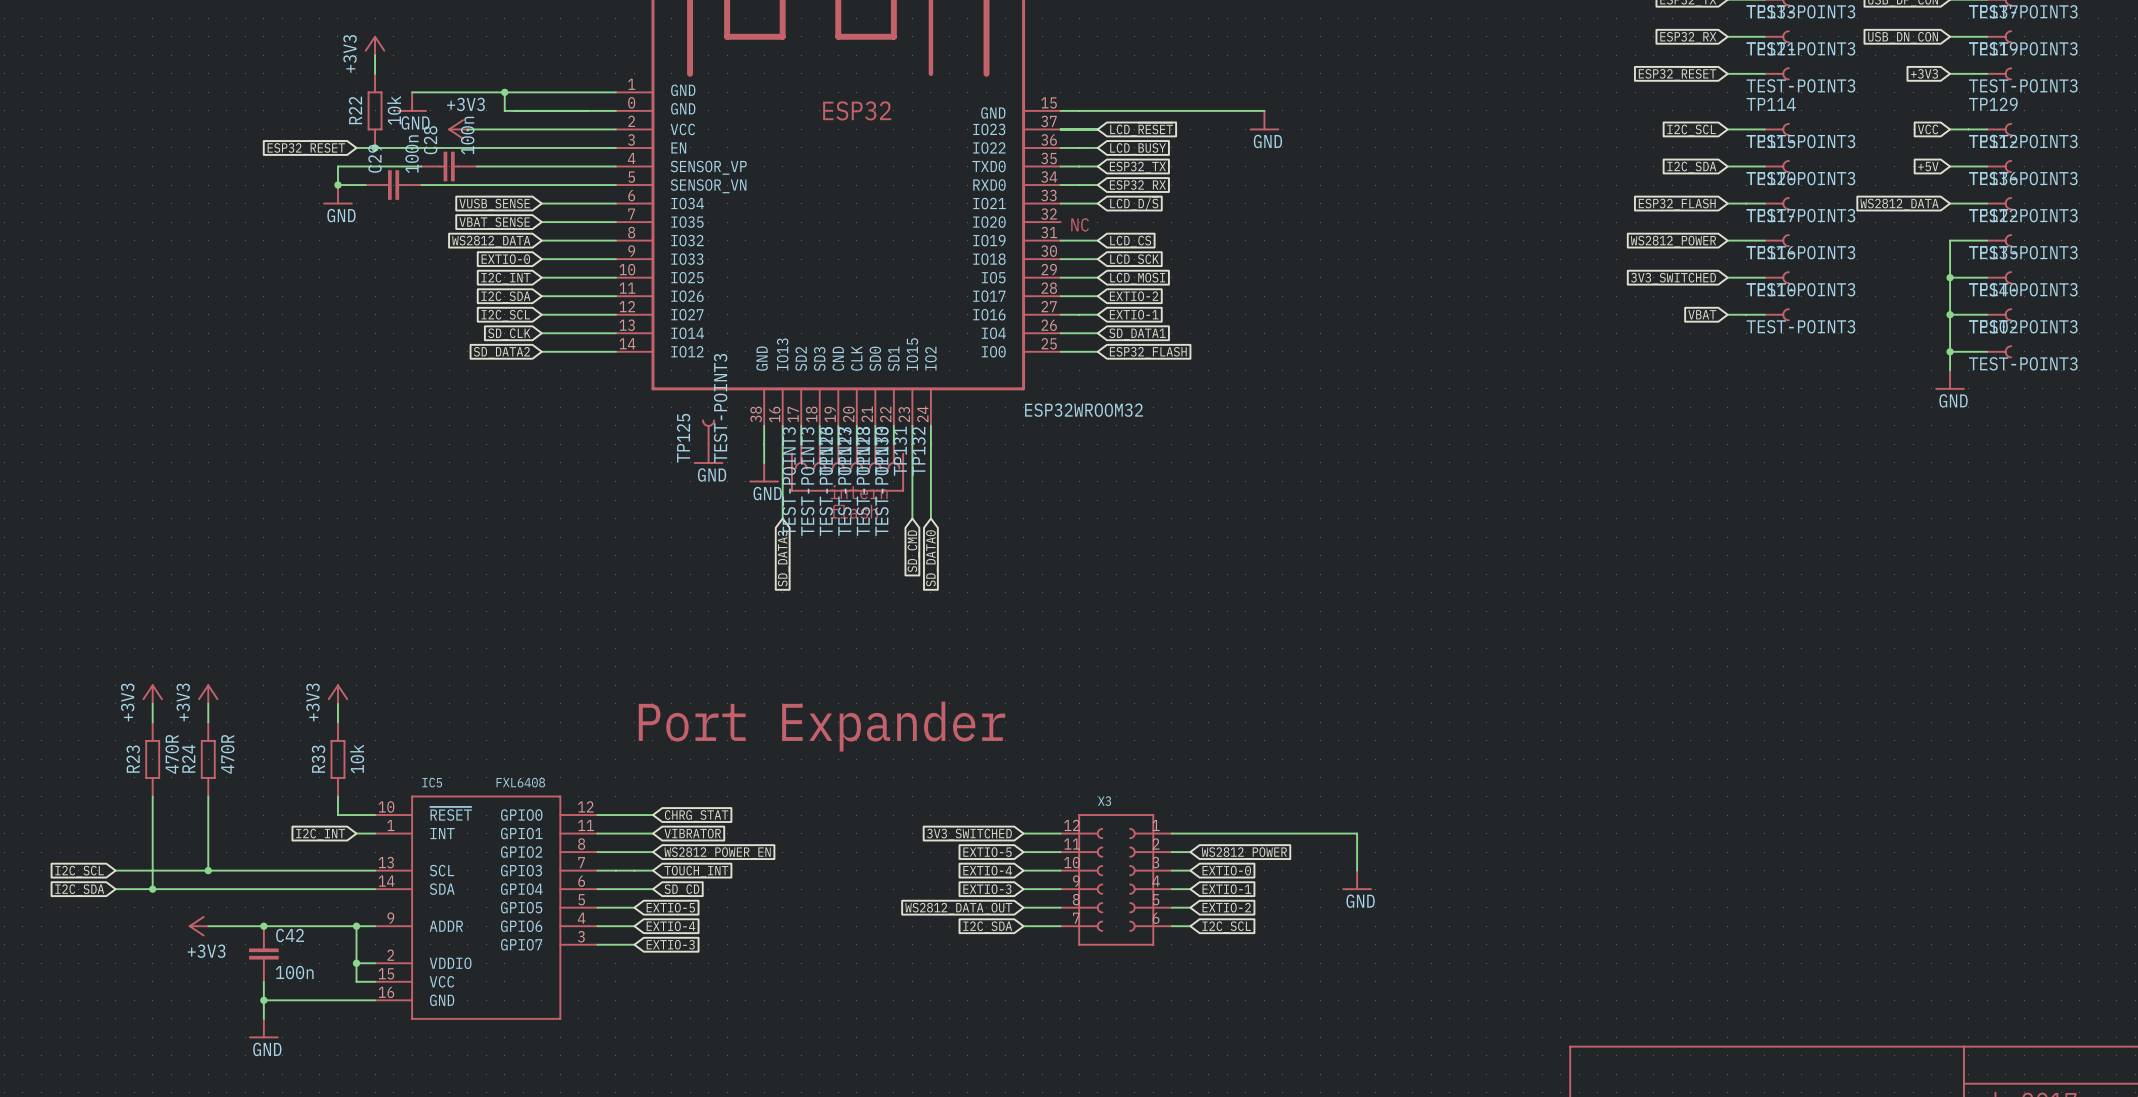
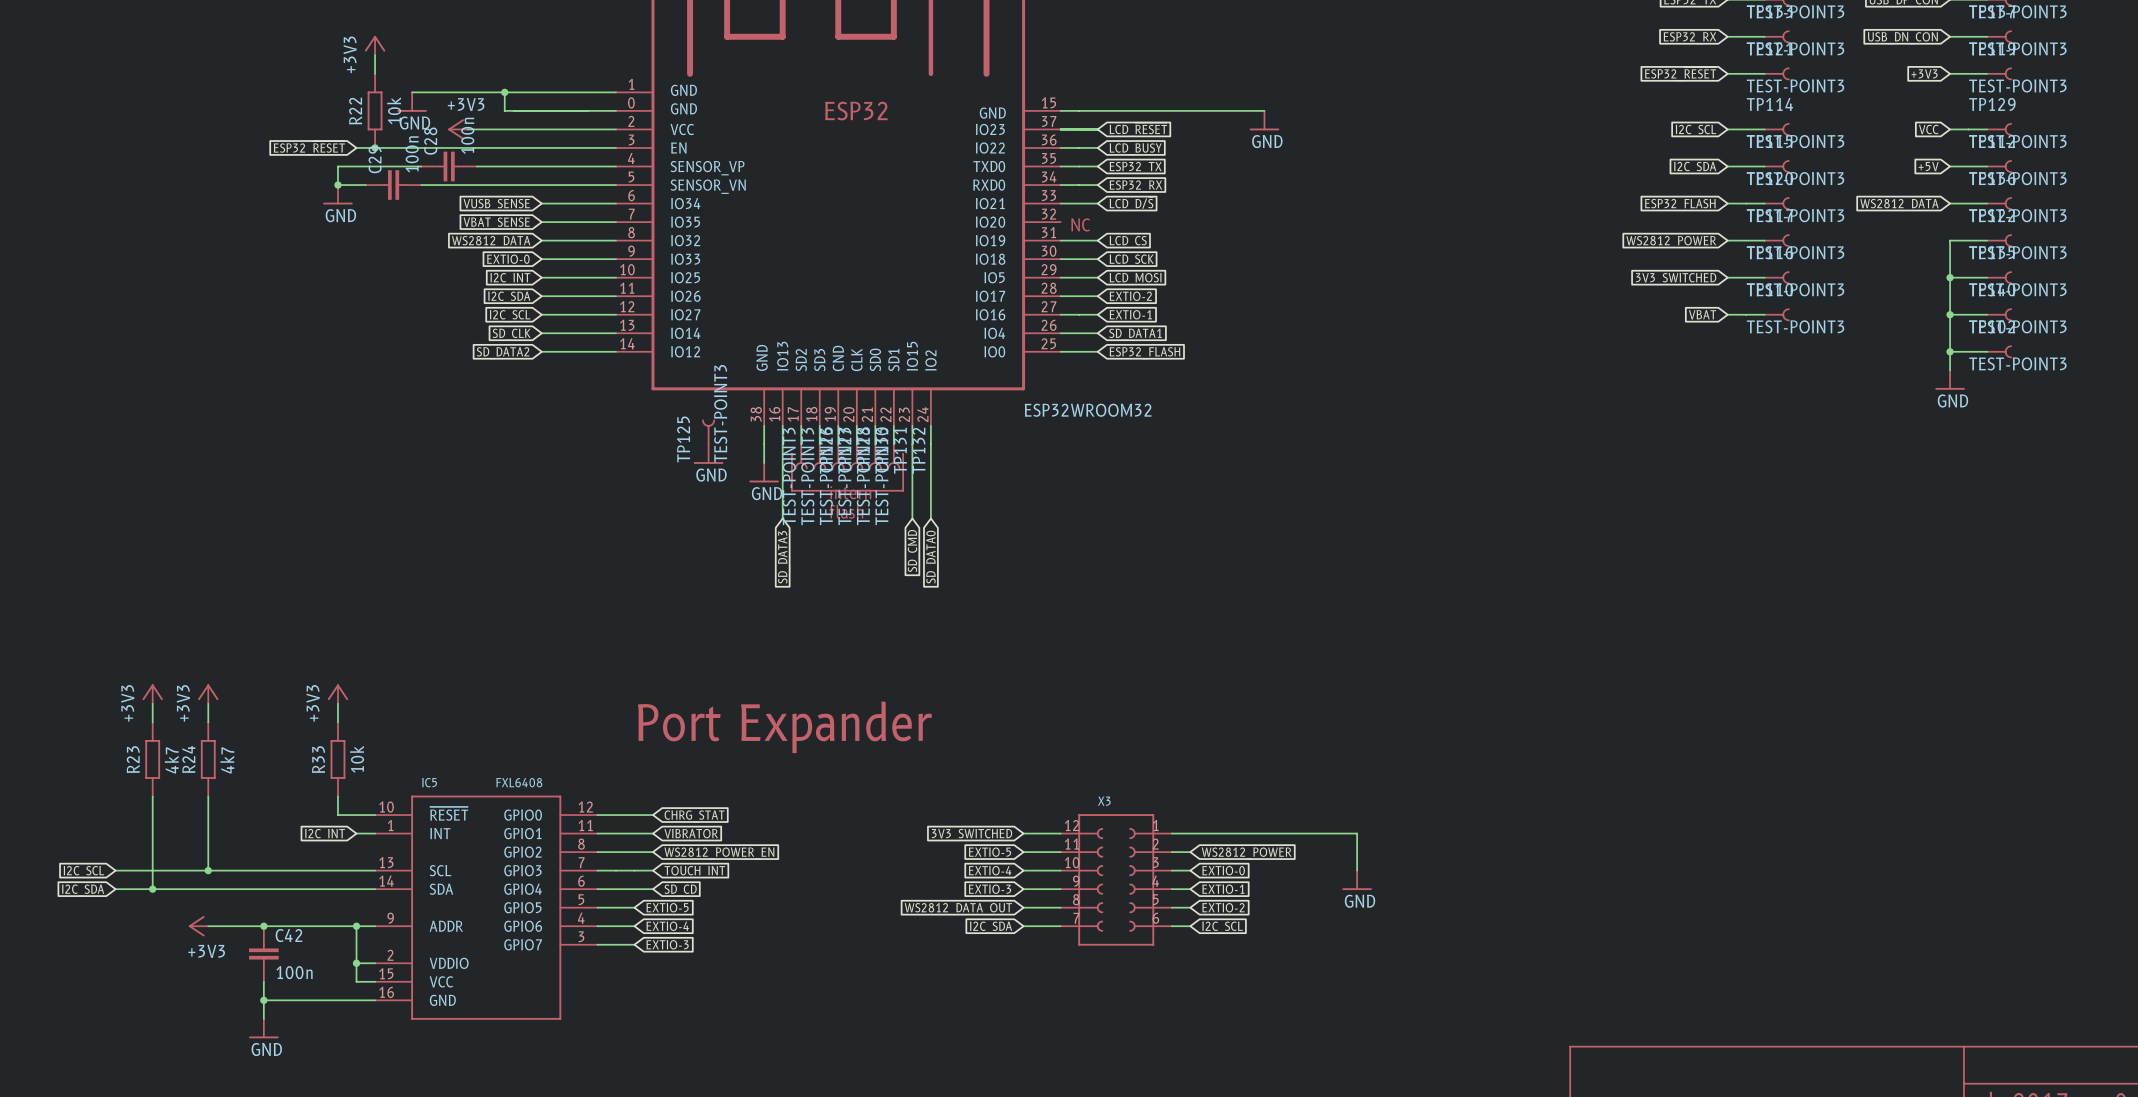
R23 value: 470R (172, 754) -> 4k7 (171, 760)
R24 value: 470R (227, 754) -> 4k7 (227, 760)

